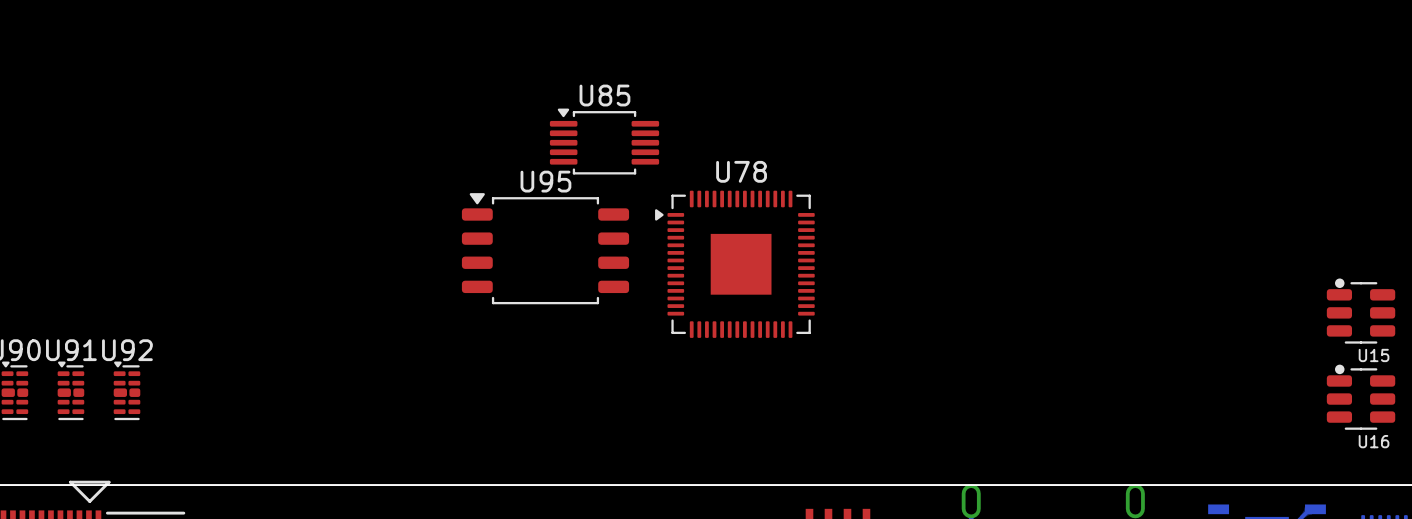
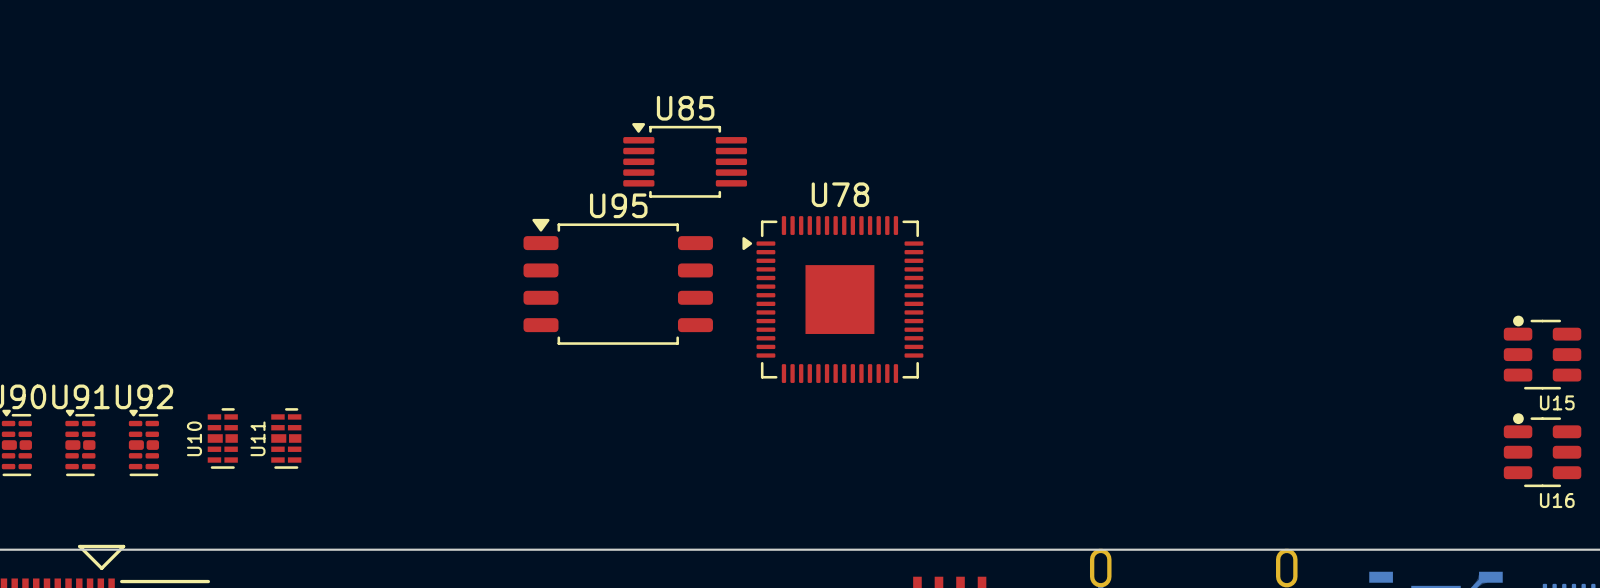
U10: none -> (222, 438)
U11: none -> (286, 438)

